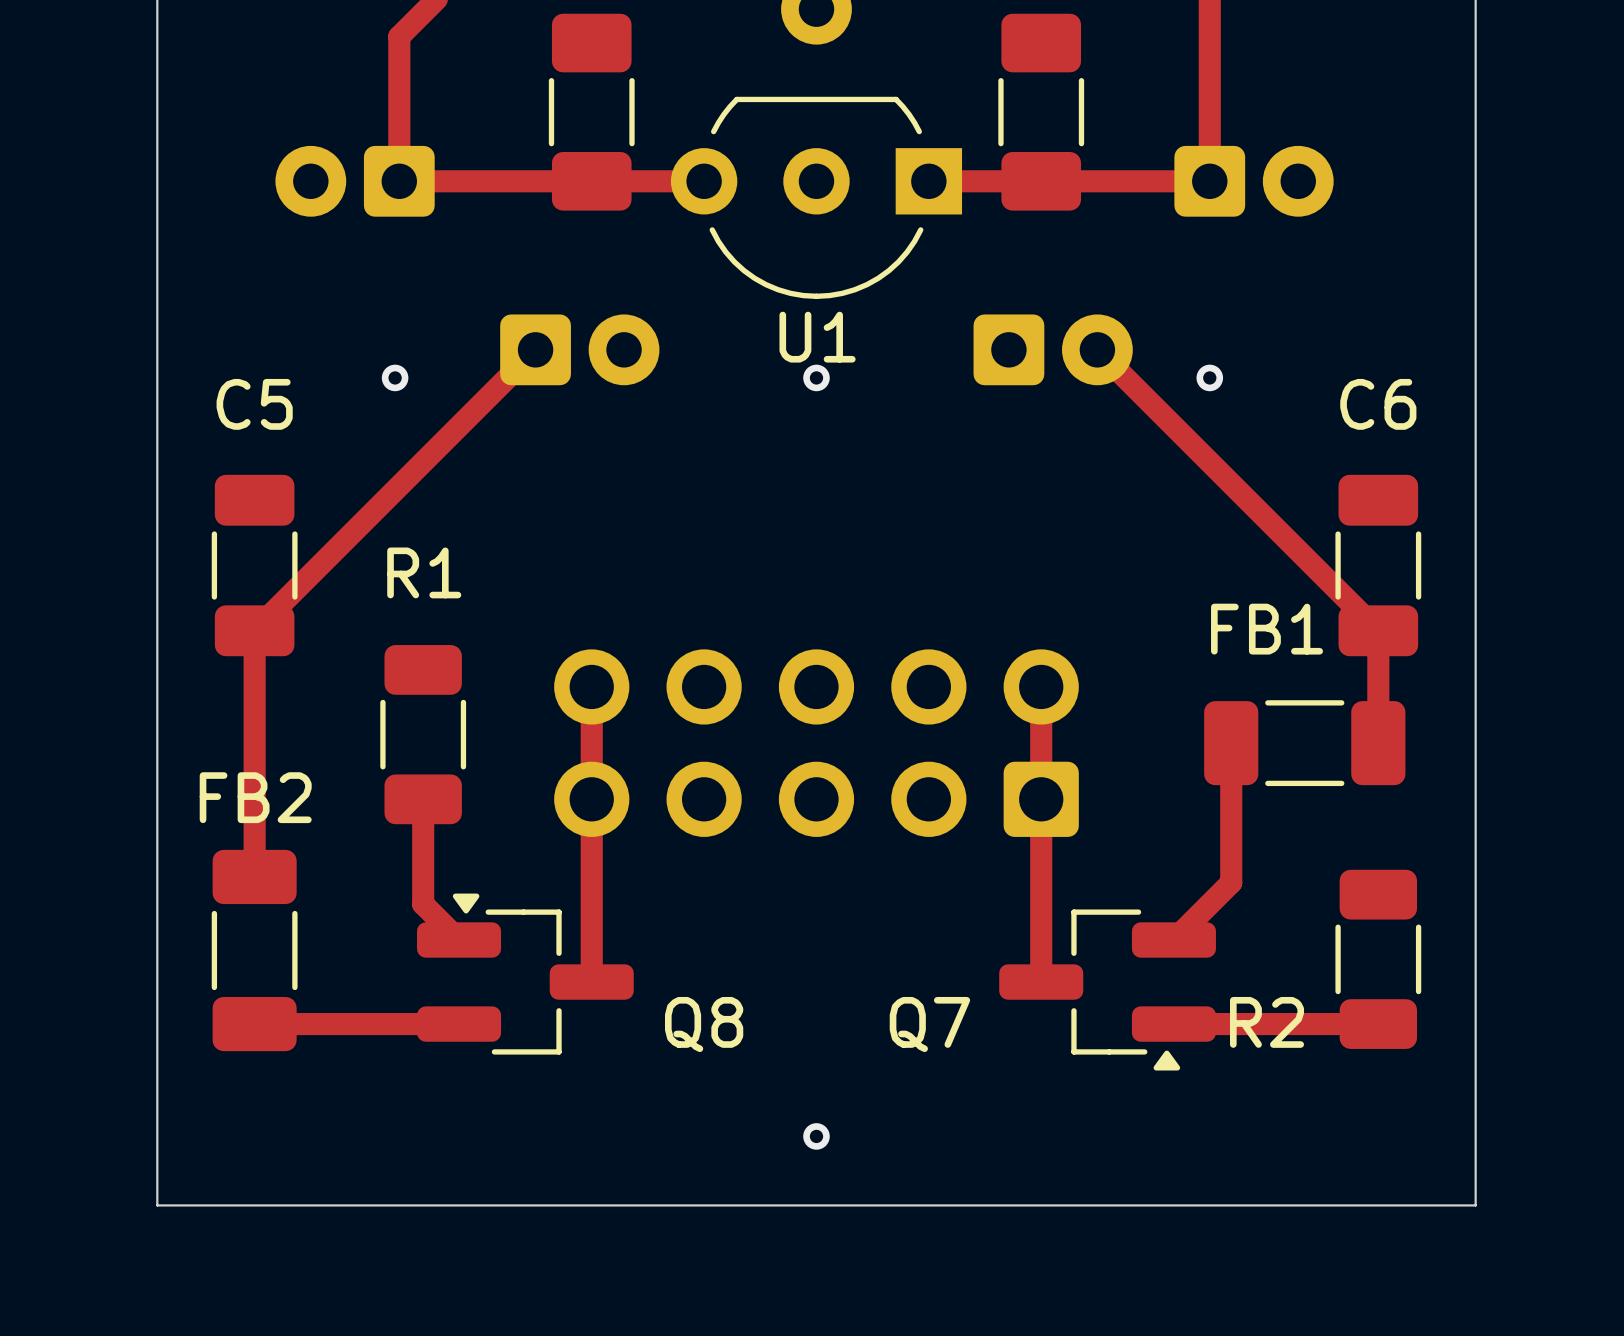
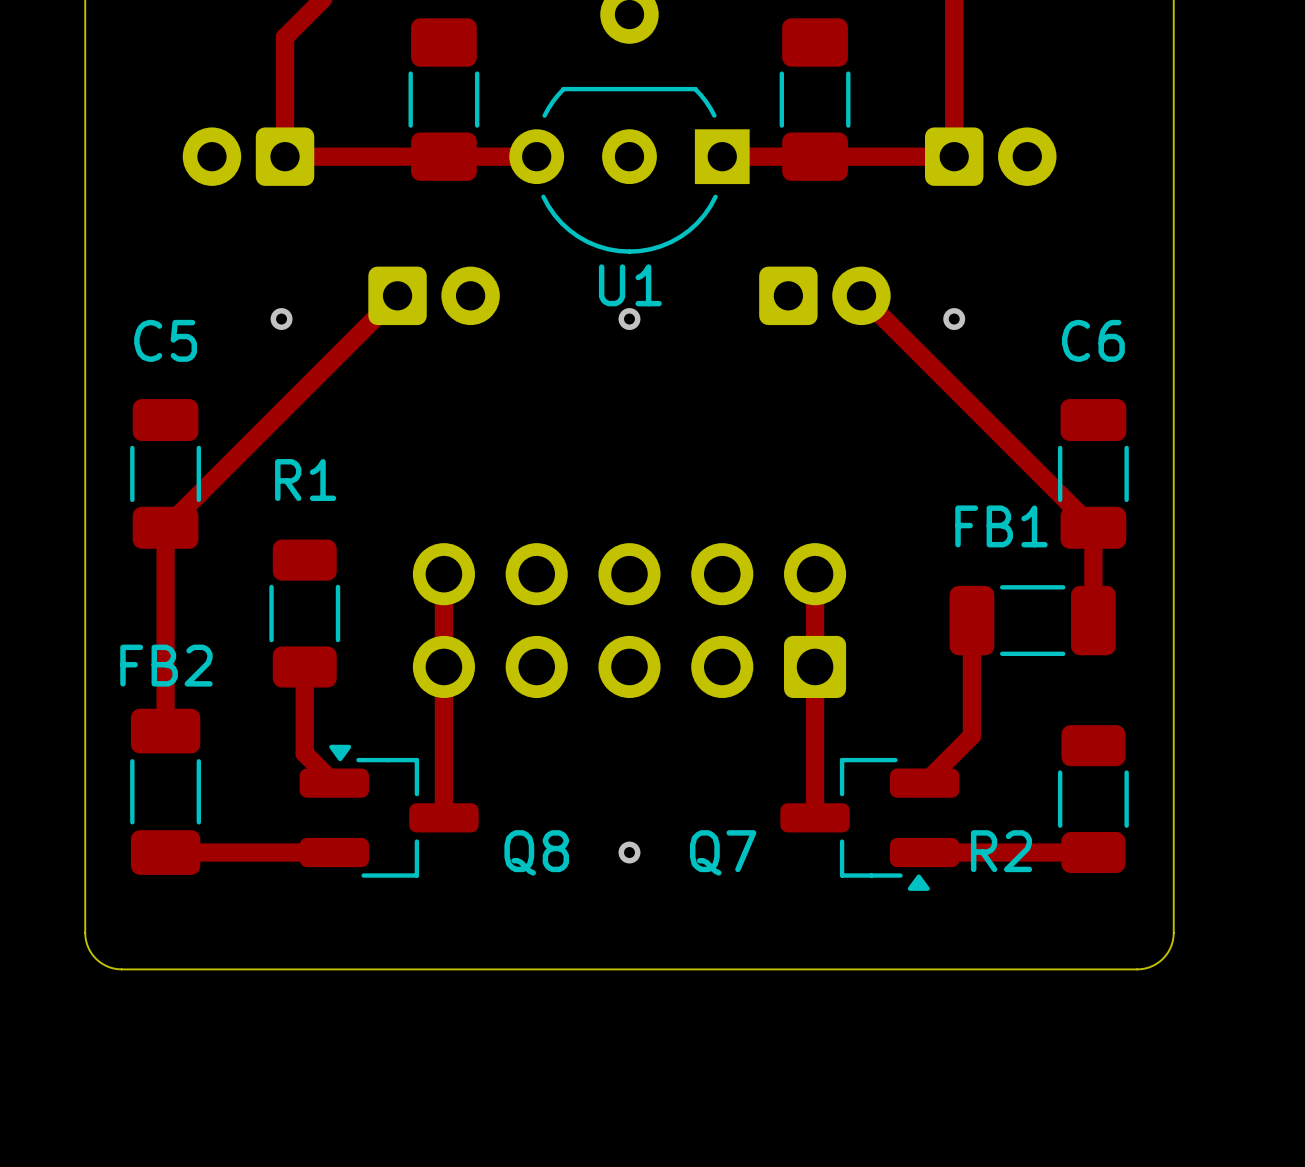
board edge: (157, 1121) (157, 1205) (1475, 1205) (1475, 1121) -> (85, 932) (87, 944) (95, 958) (105, 965) (121, 969) (1137, 969) (1153, 965) (1163, 958) (1171, 944) (1173, 932)
via position: (816, 1136) -> (629, 852)

